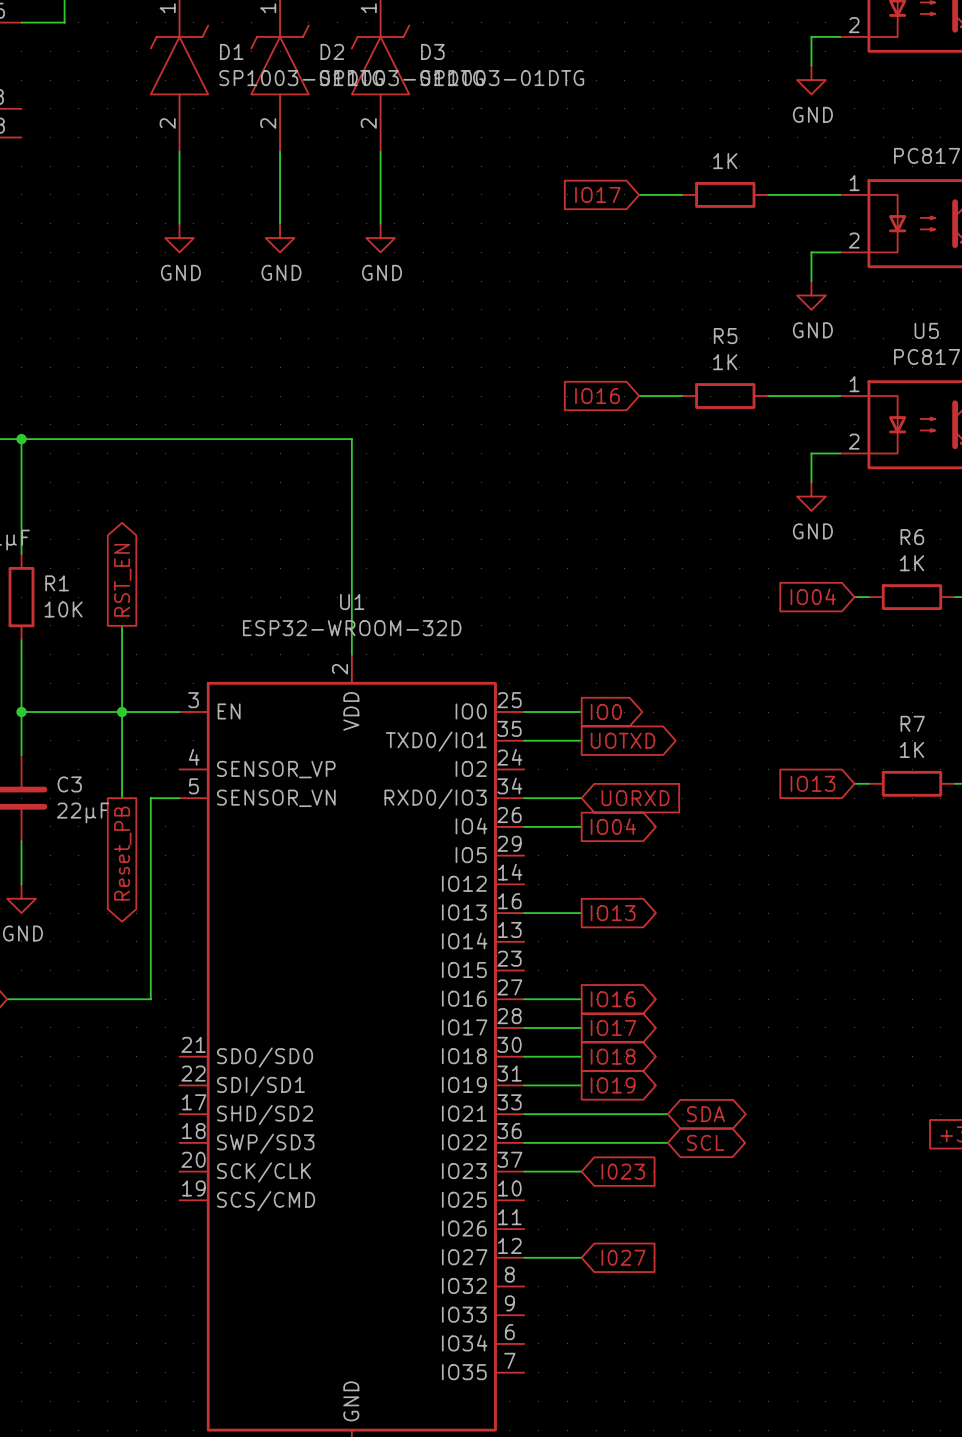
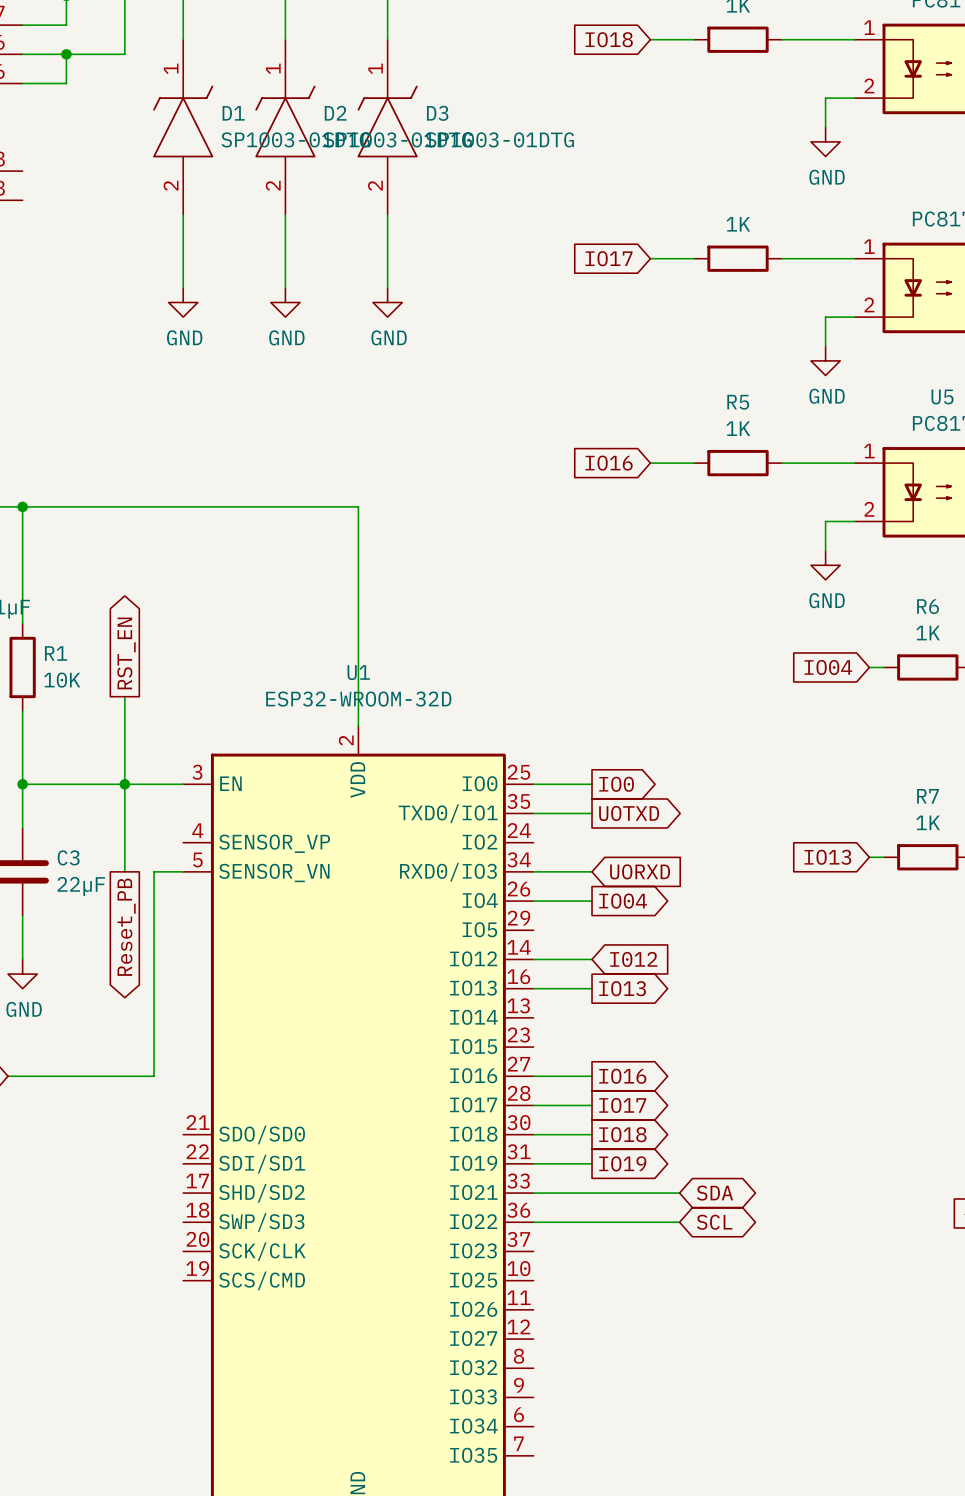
wire: none -> (533, 959) (592, 959)
global label: none -> I012 (633, 959)
wire: (524, 1171) (581, 1171) -> none
global label: I023 (623, 1171) -> none
wire: (524, 1257) (581, 1257) -> none
global label: I027 (623, 1257) -> none

